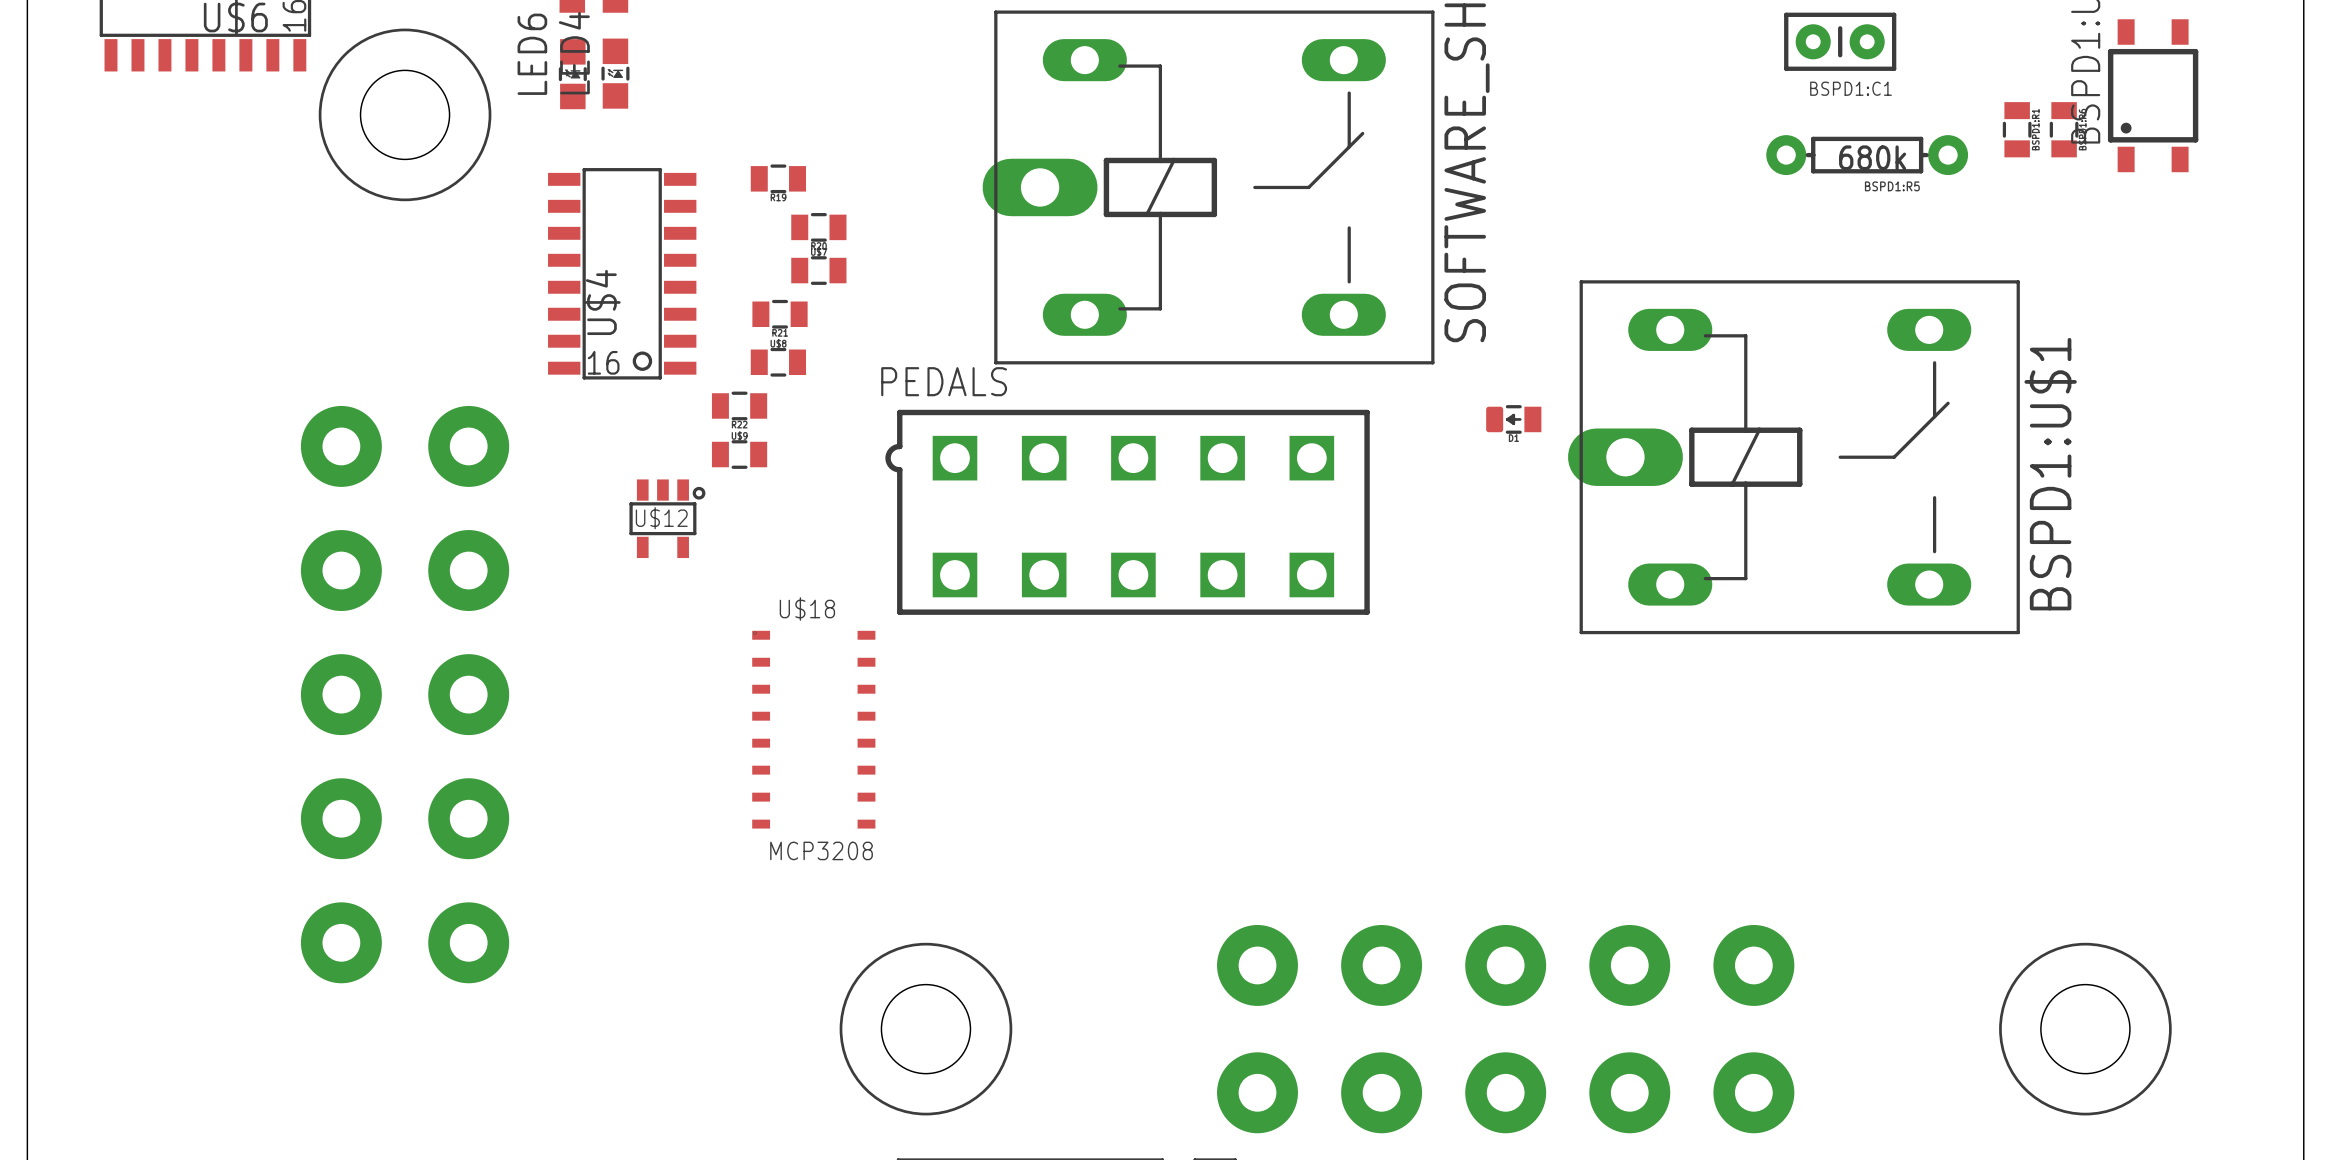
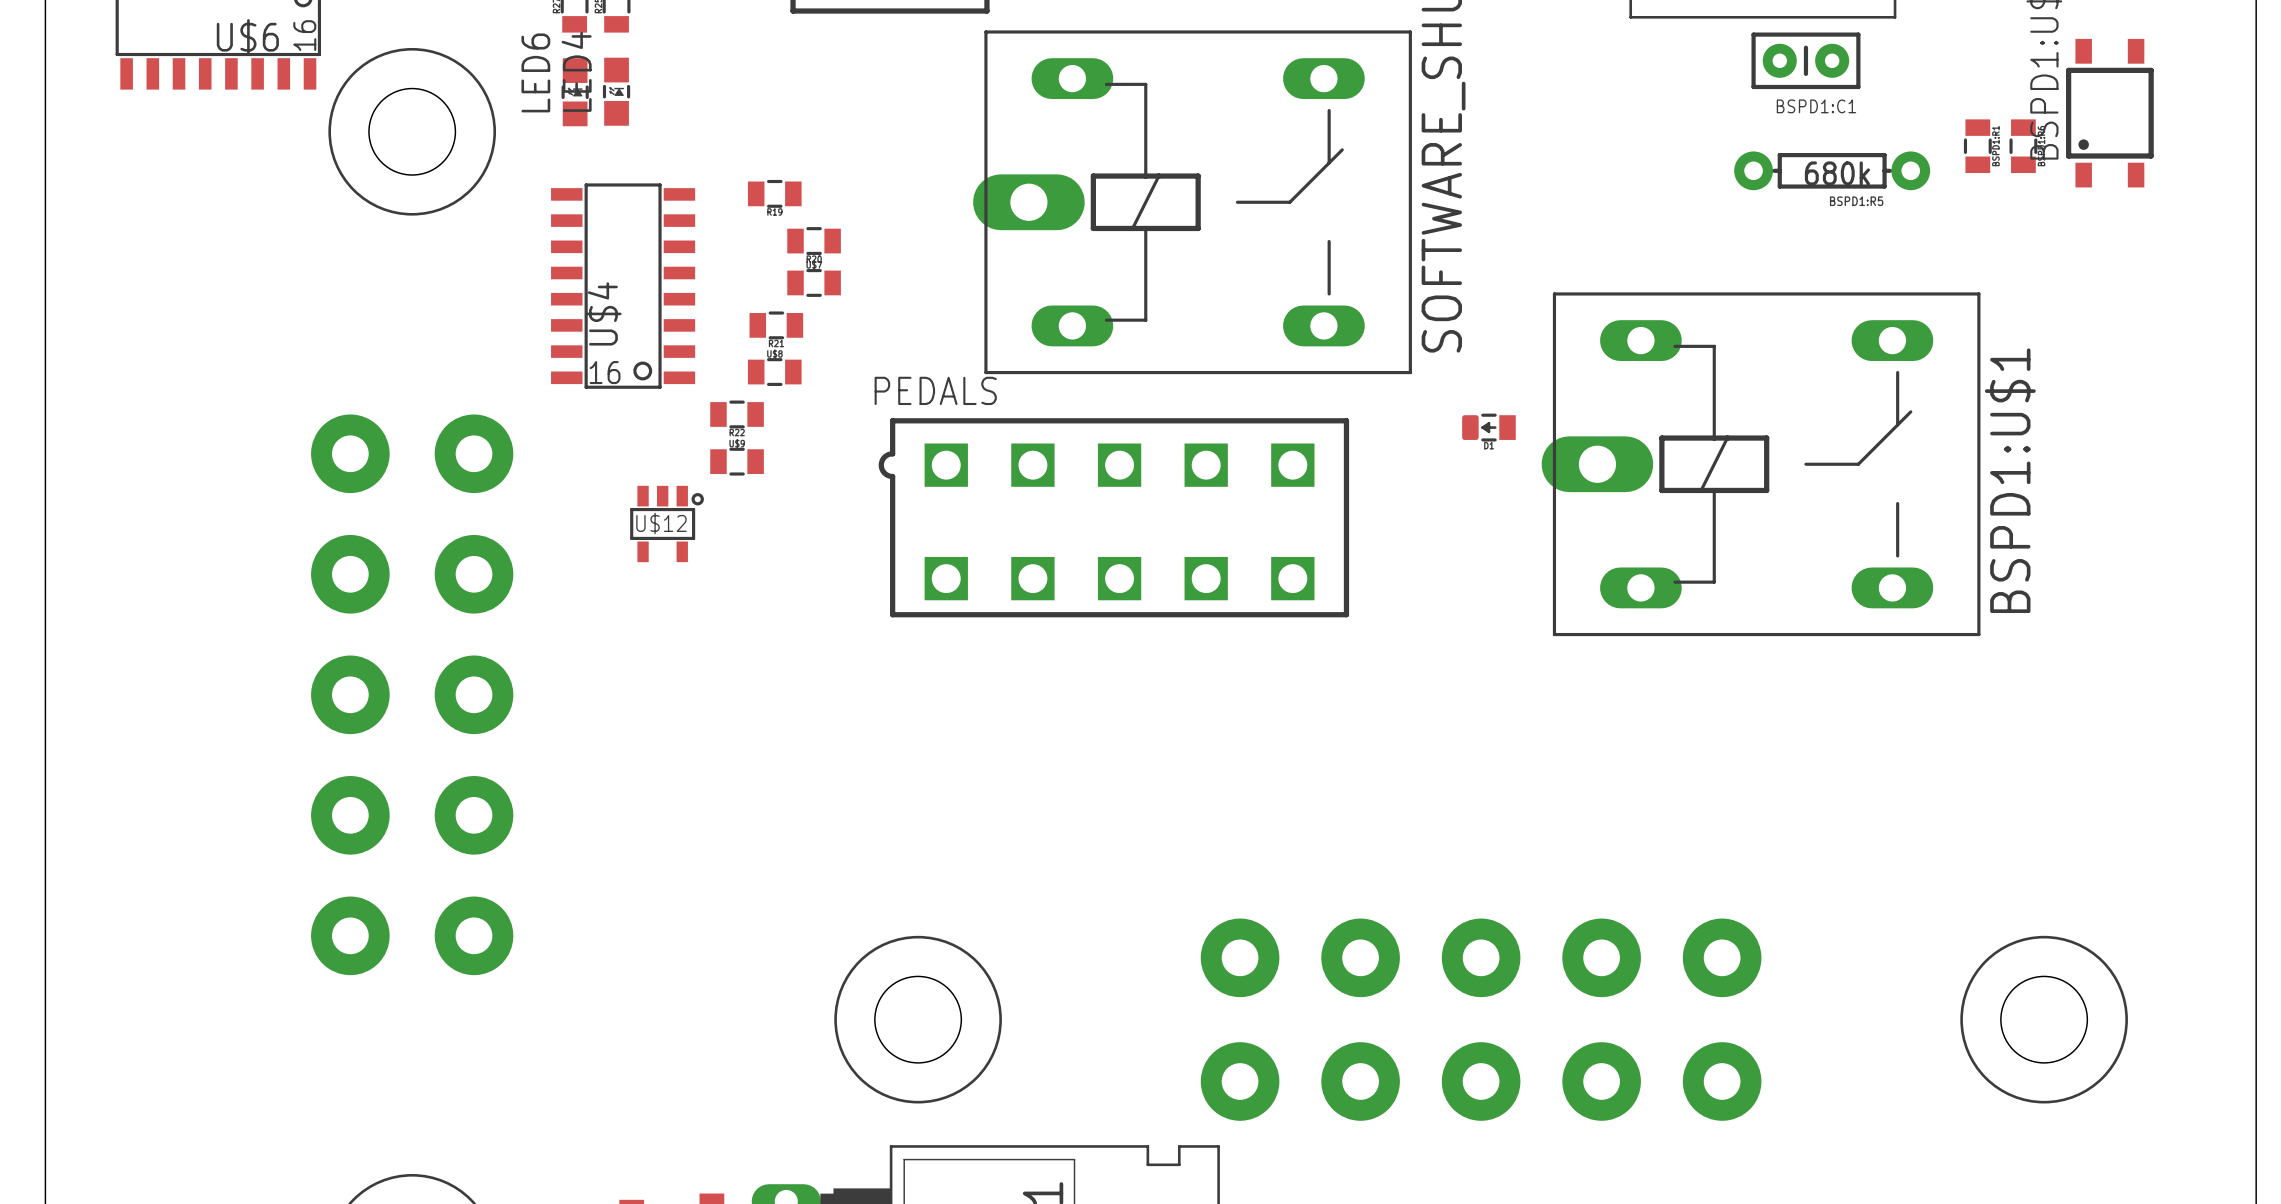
U$18: MCP3208 (813, 729) -> none

